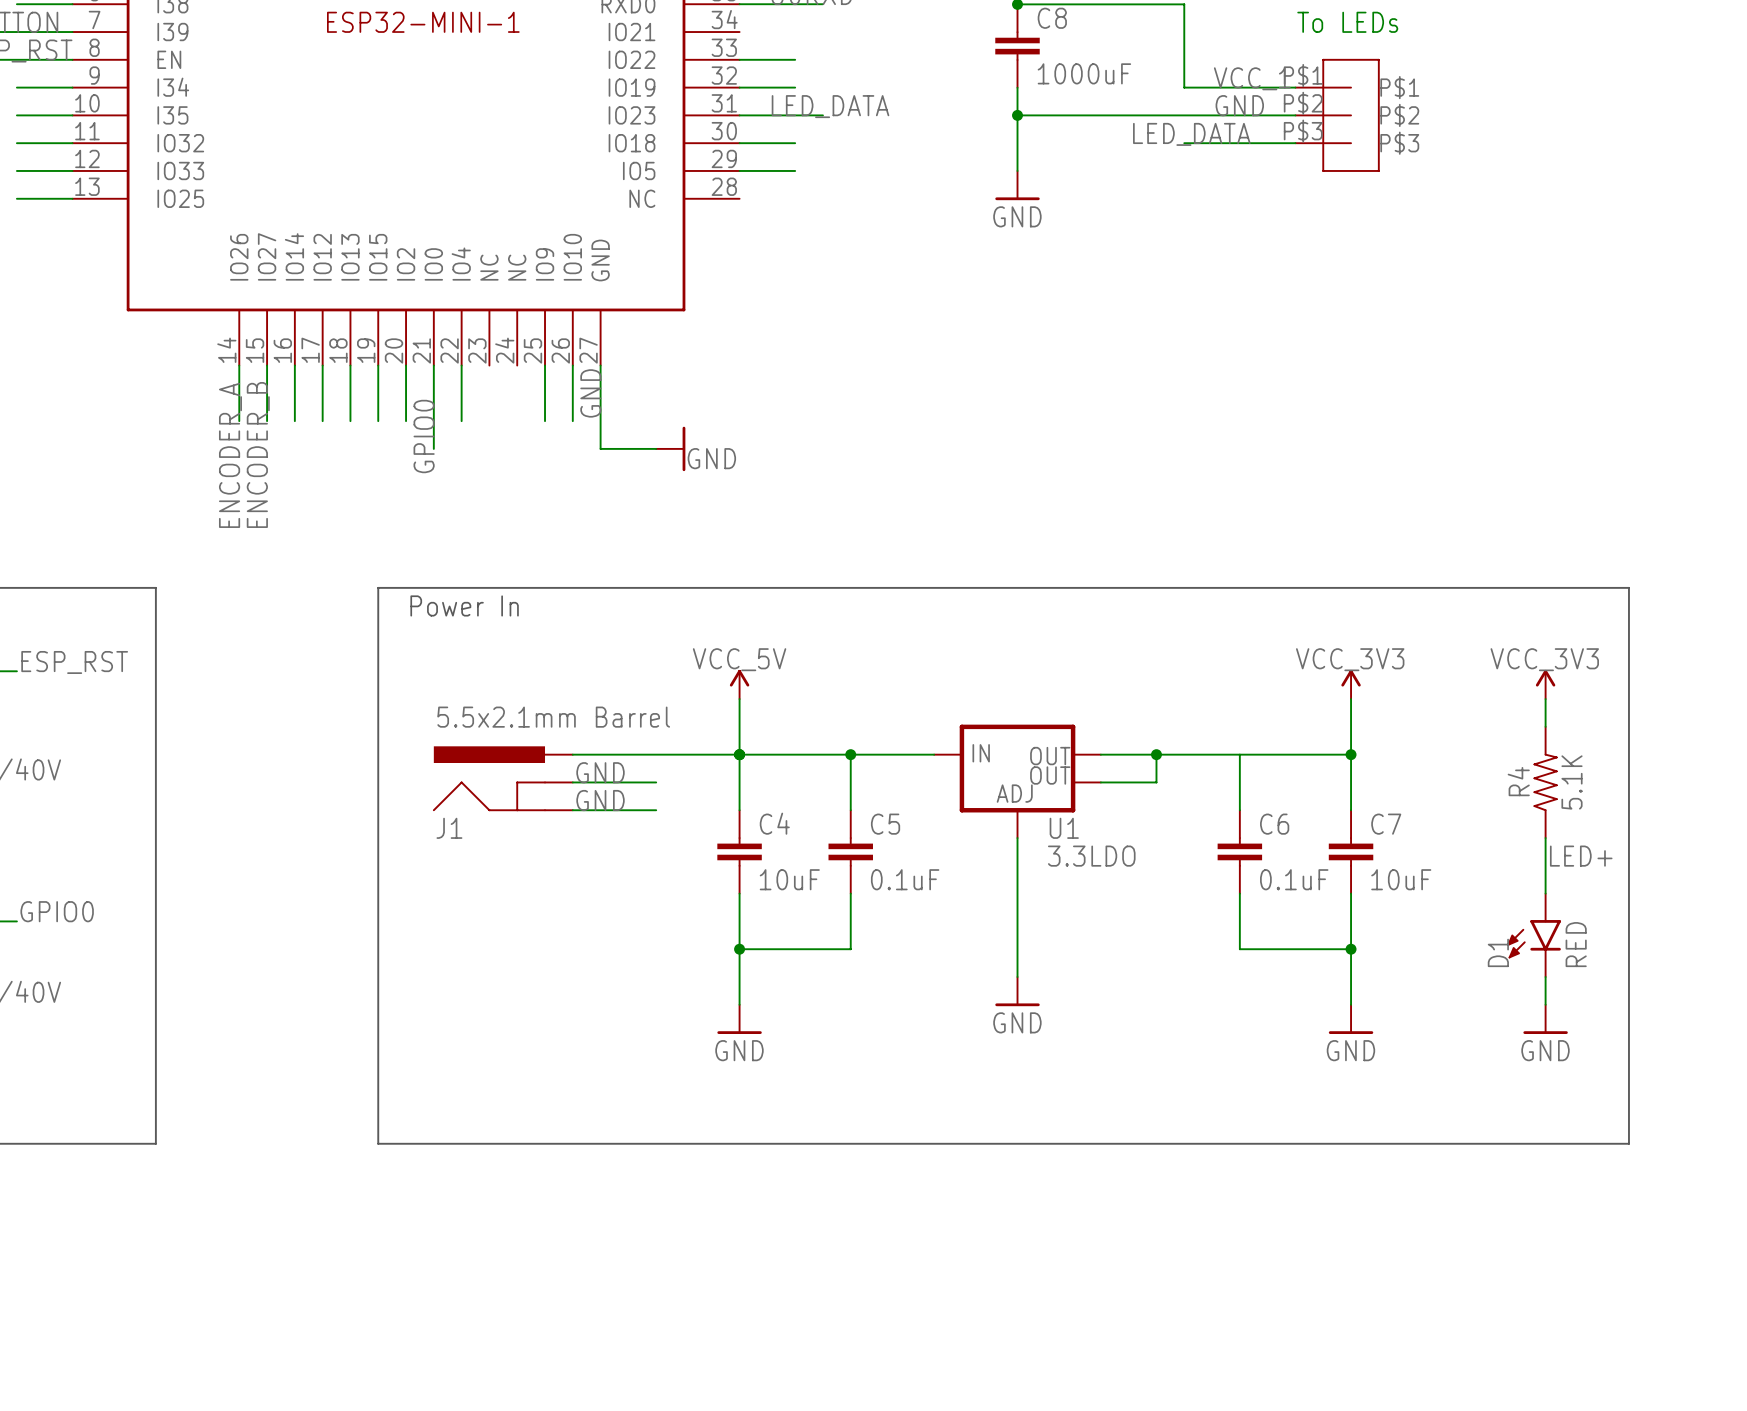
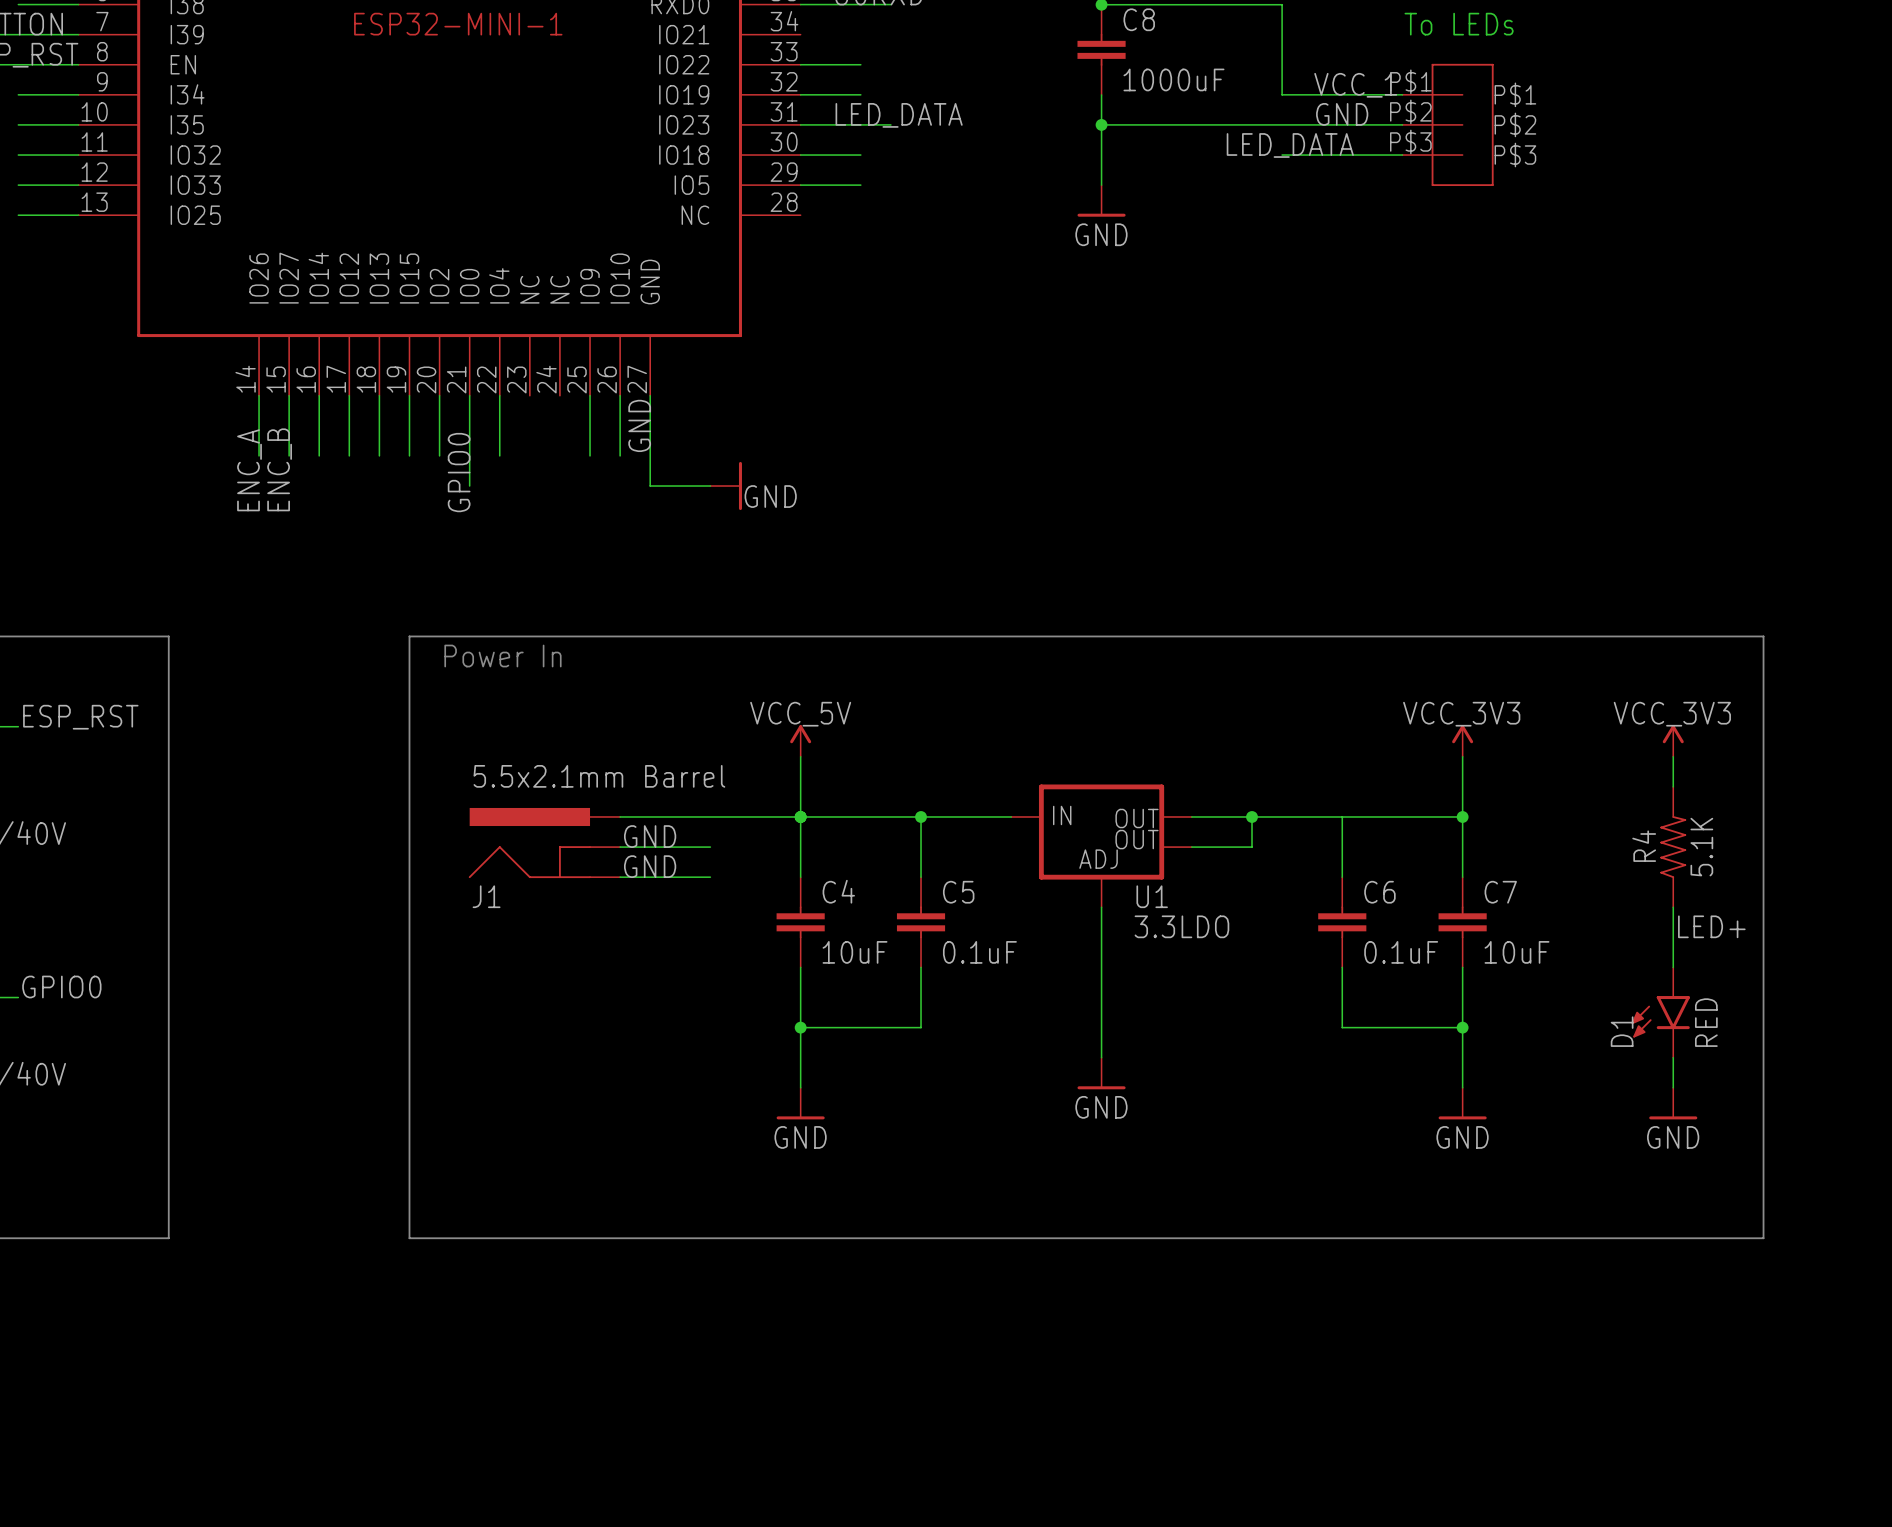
label: ENCODER_B (258, 454) -> ENC_B (279, 469)
label: ENCODER_A (230, 455) -> ENC_A (249, 470)

